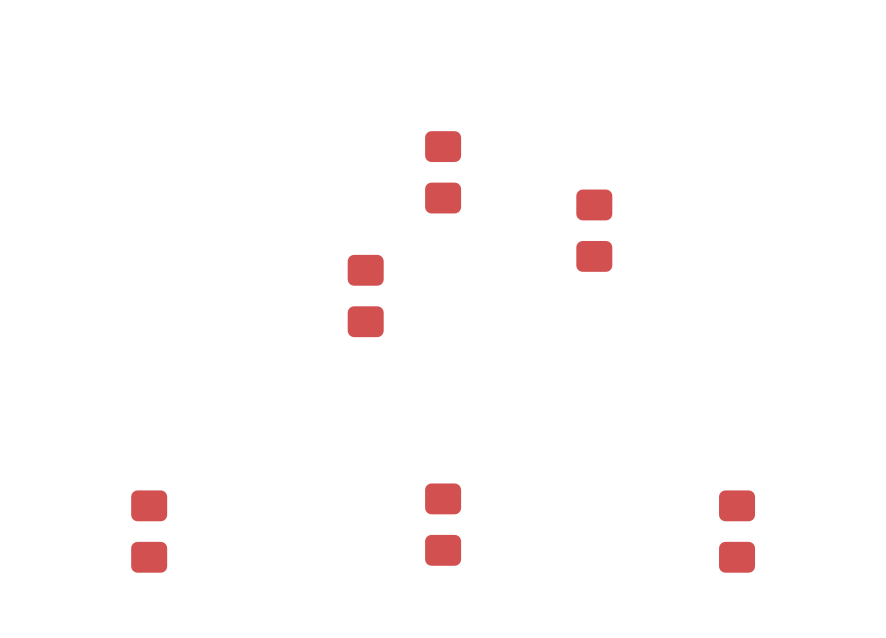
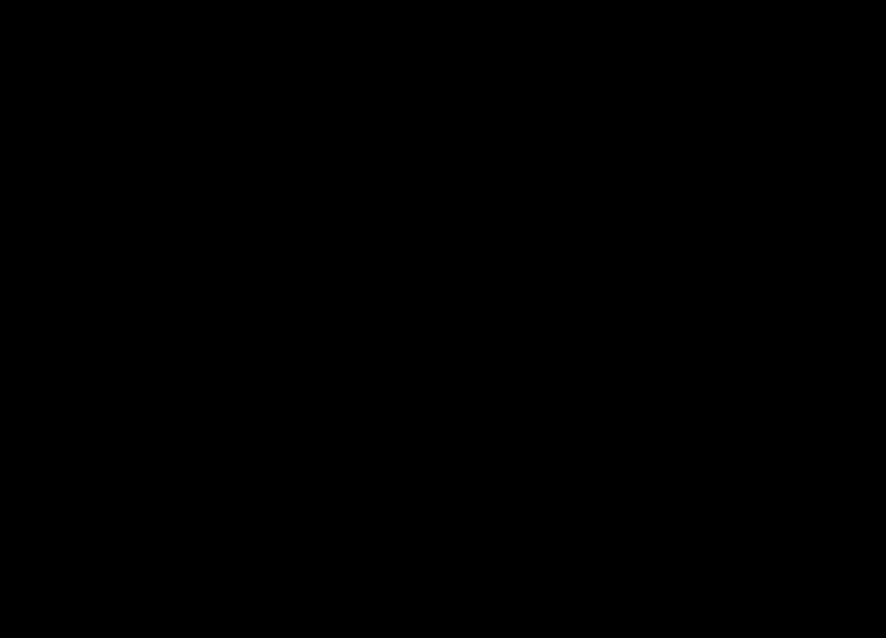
part: (443, 172) -> none
part: (594, 230) -> none
part: (365, 296) -> none
part: (443, 524) -> none
part: (149, 531) -> none
part: (737, 531) -> none

